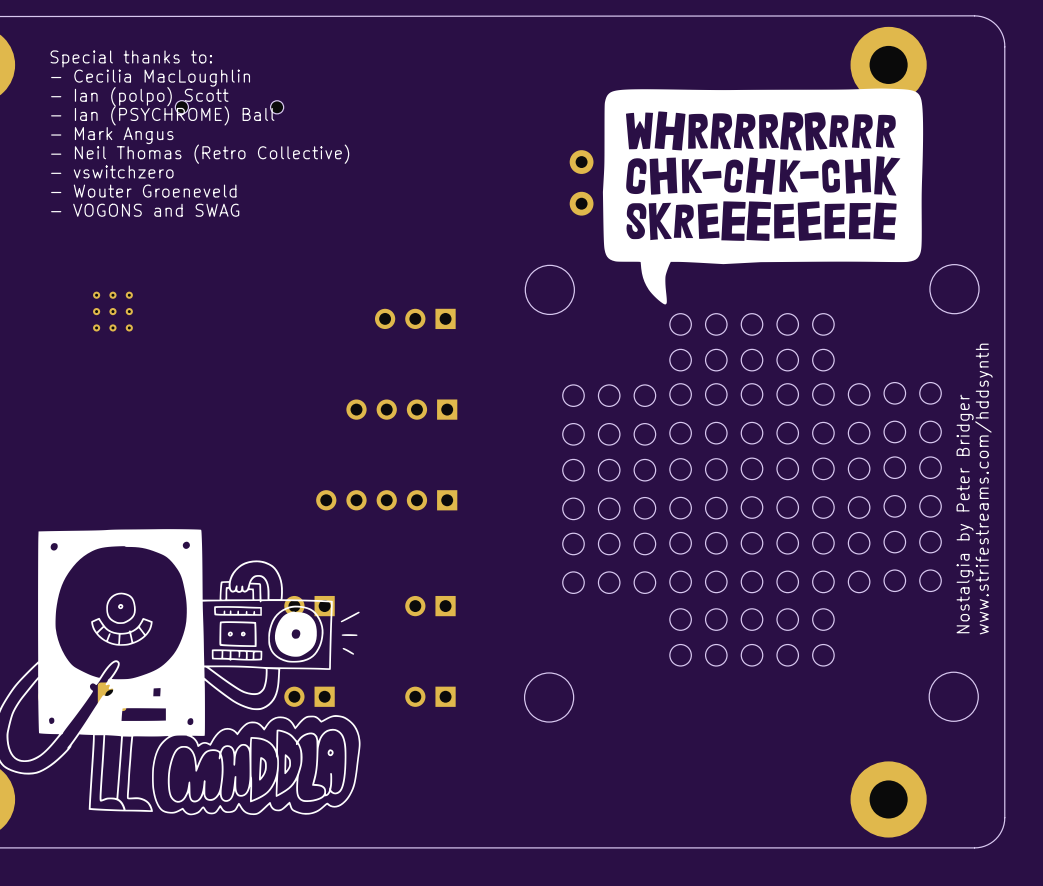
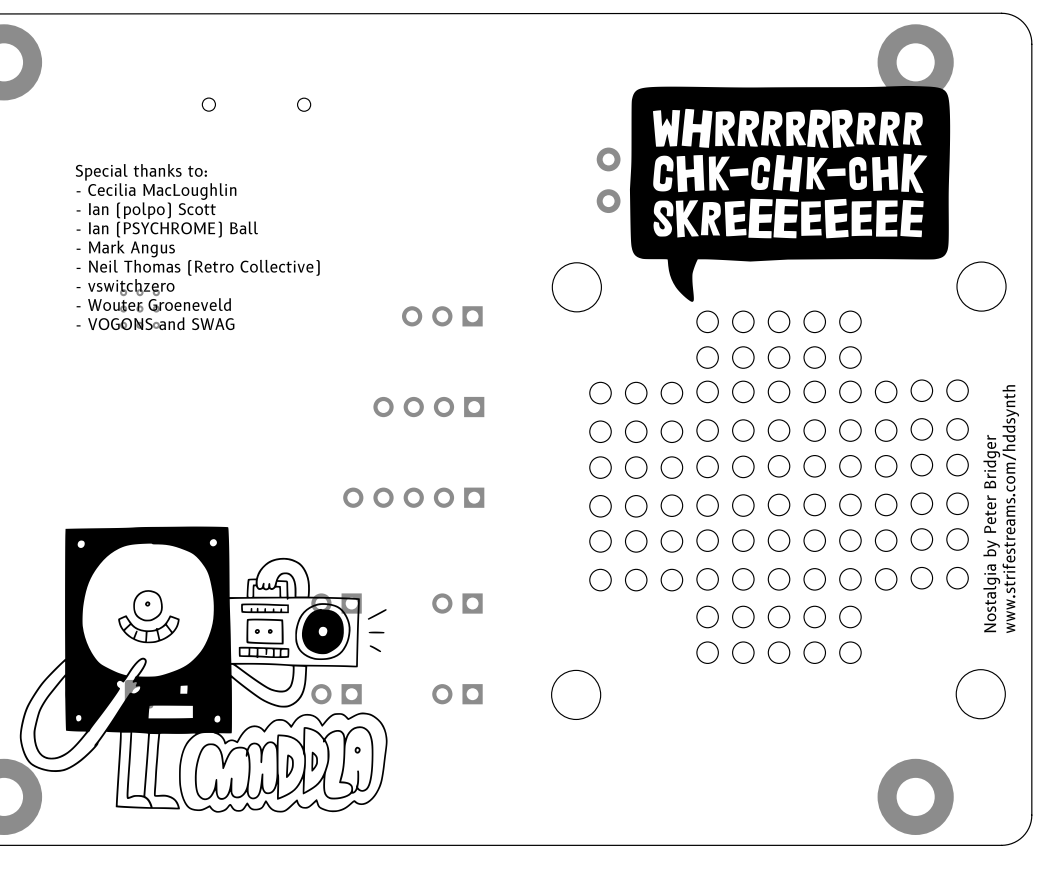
text: Special thanks to: (131, 58) -> none
text: - Cecilia MacLoughlin (150, 78) -> none
text: - Ian (polpo) Scott (139, 96) -> none
text position: - Ian (PSYCHROME) Ball (162, 115) -> - Ian (PSYCHROME) Ball (167, 229)
text position: - Mark Angus (112, 135) -> - Mark Angus (125, 249)
text position: - Neil Thomas (Retro Collective) (200, 154) -> - Neil Thomas (Retro Collective) (198, 267)
text: - vswitchzero (112, 171) -> Special thanks to: (141, 172)
text: - Wouter Groeneveld (143, 191) -> - Cecilia MacLoughlin (156, 191)
text: - VOGONS and SWAG (145, 210) -> - Ian (polpo) Scott (146, 210)
text: none -> - vswitchzero (125, 285)
text: none -> - Wouter Groeneveld (153, 304)
text: none -> - VOGONS and SWAG (155, 323)

